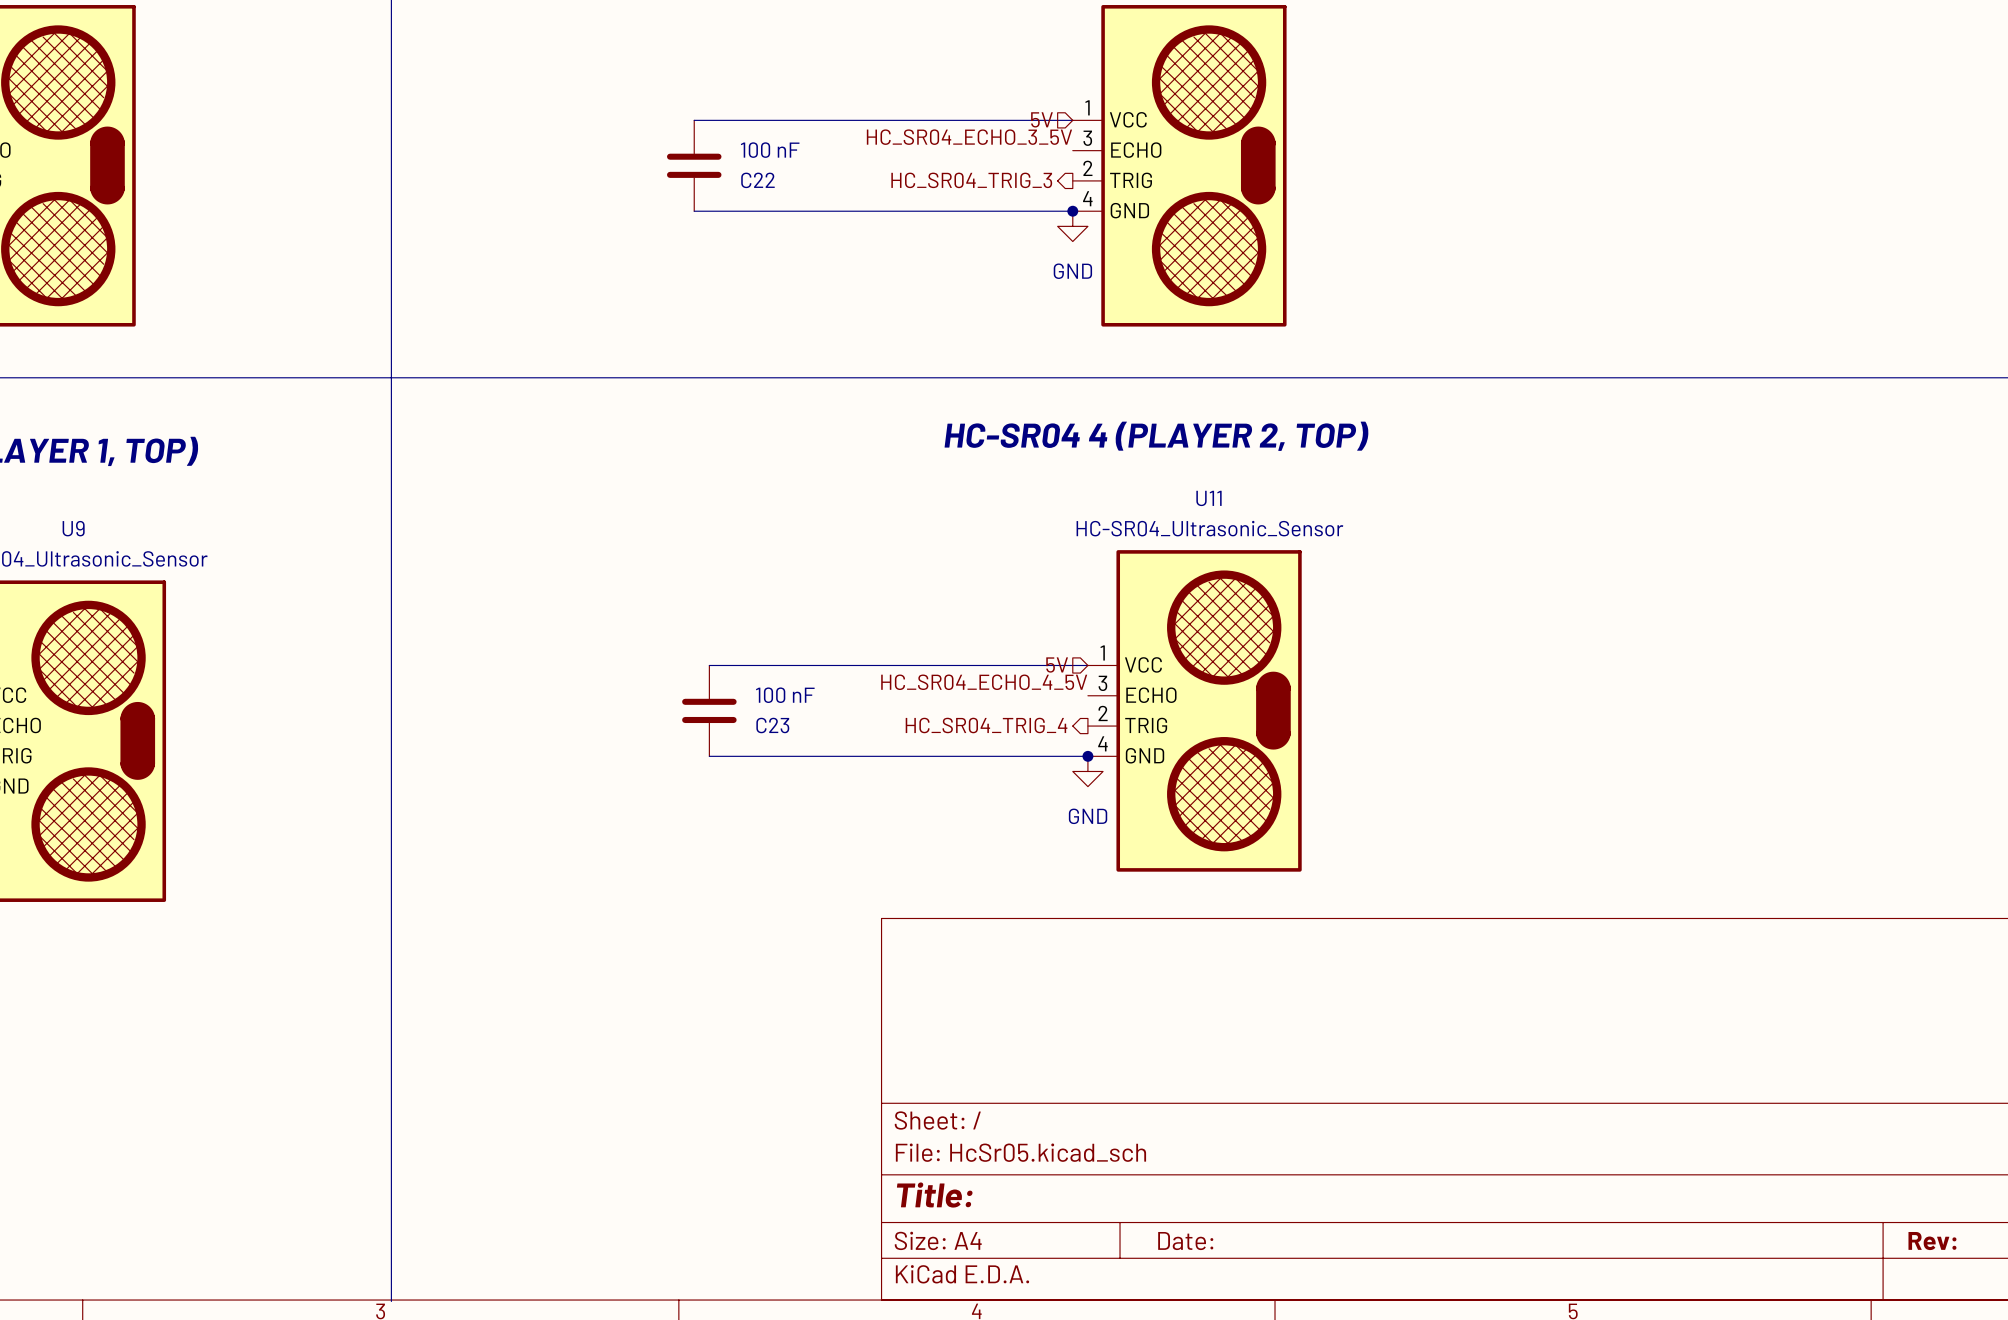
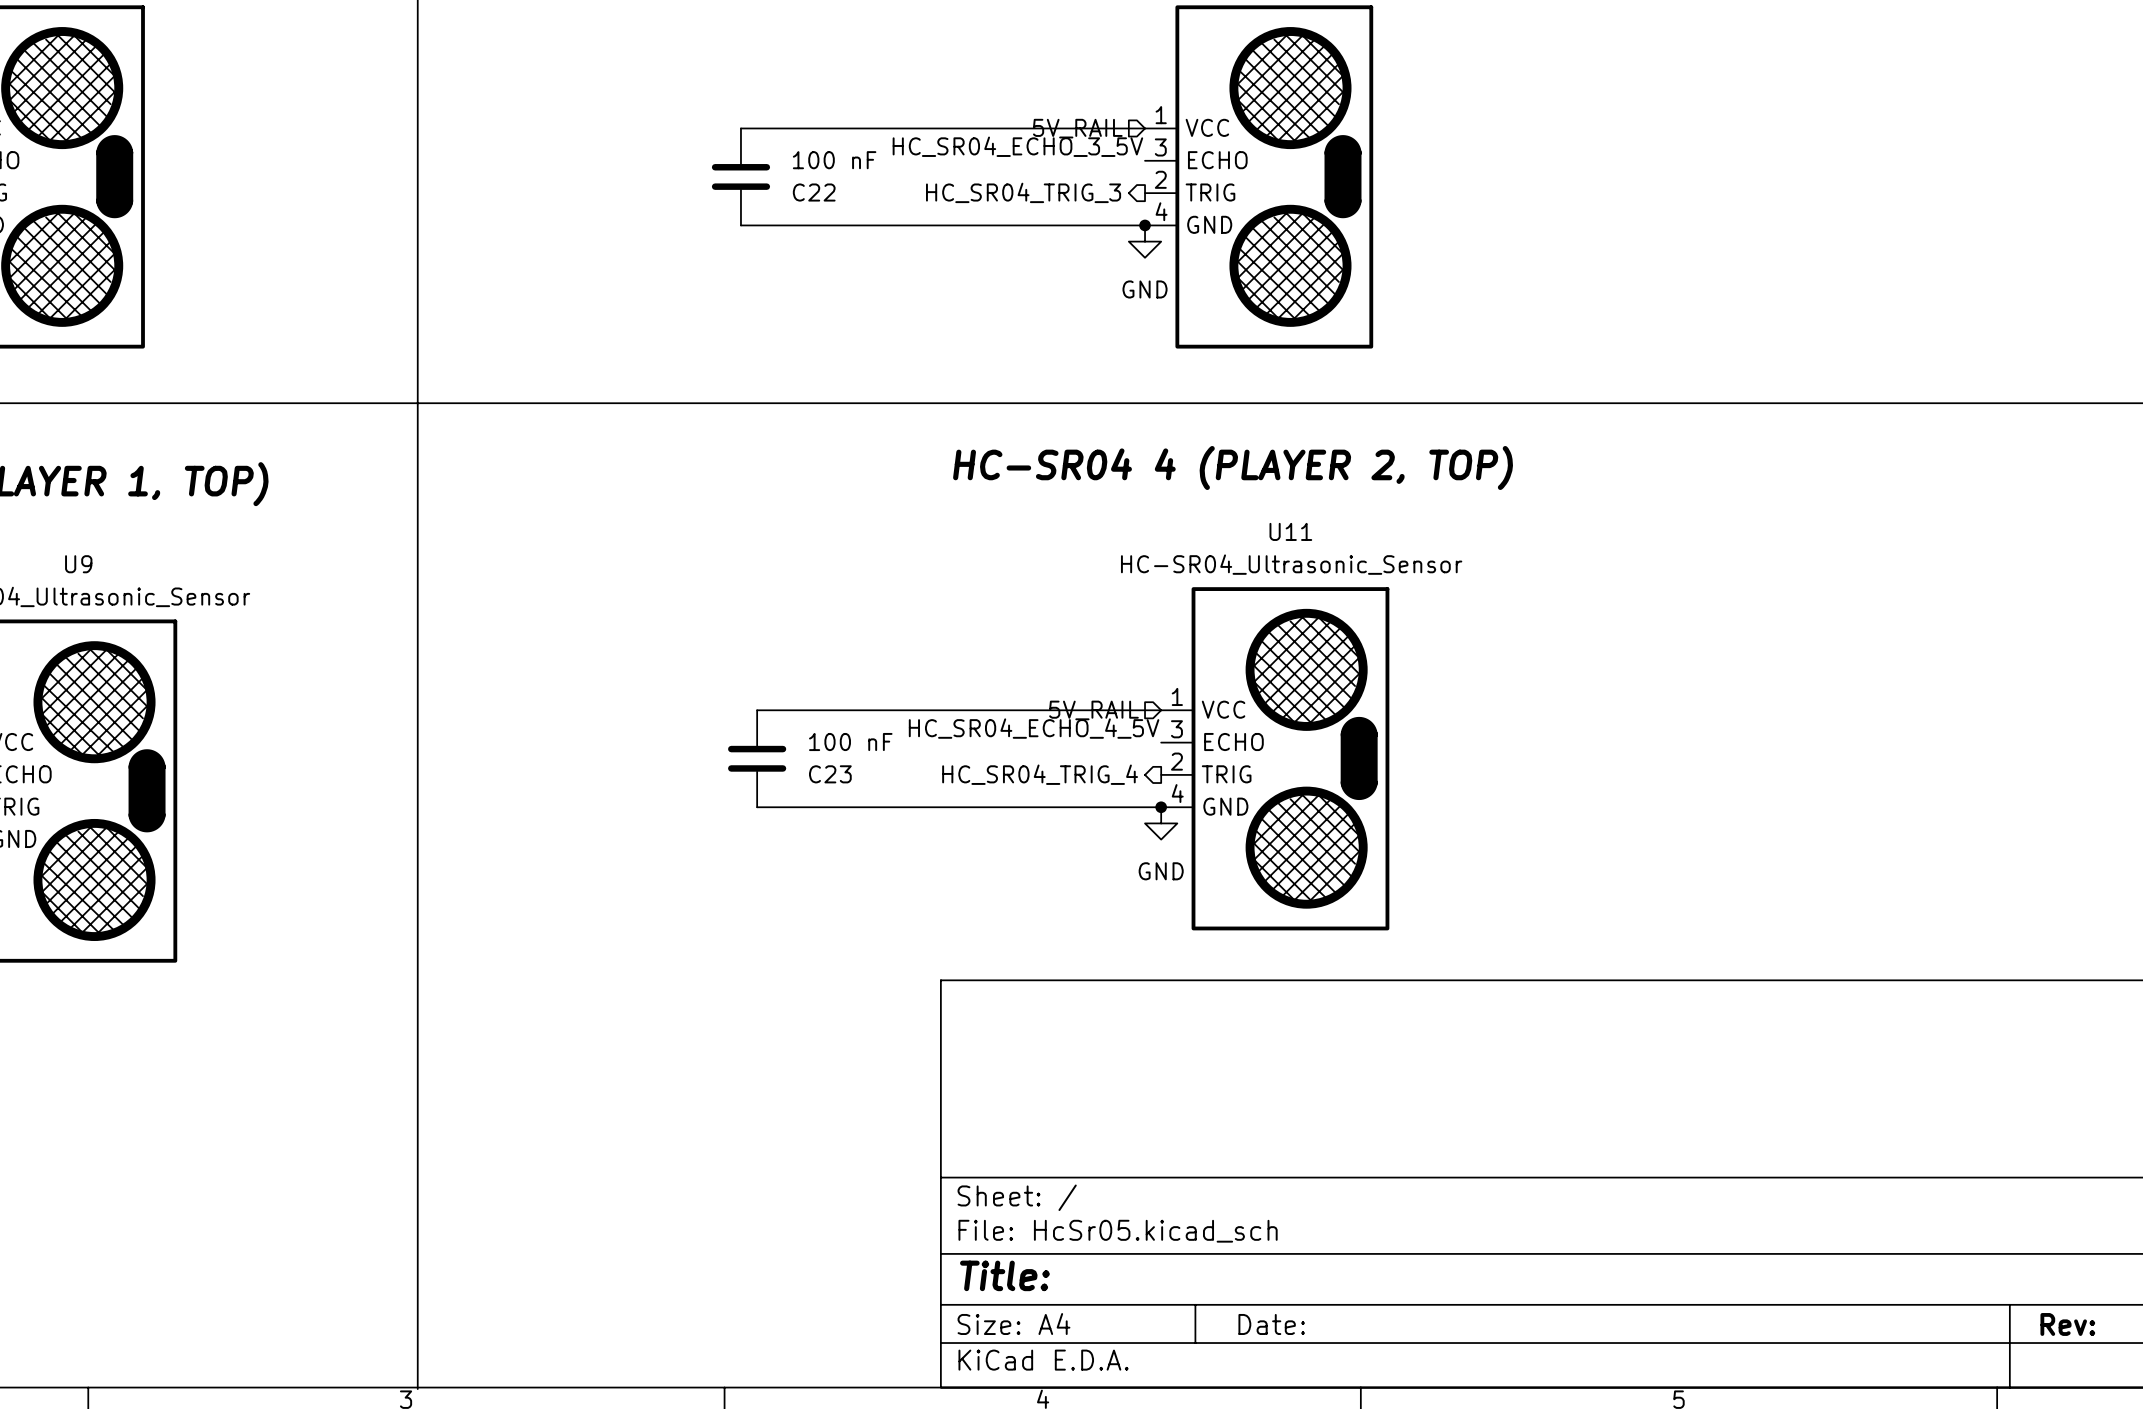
hierarchical label: 5V (1041, 119) -> 5V_RAIL (1077, 128)
hierarchical label: 5V (1057, 664) -> 5V_RAIL (1093, 710)

